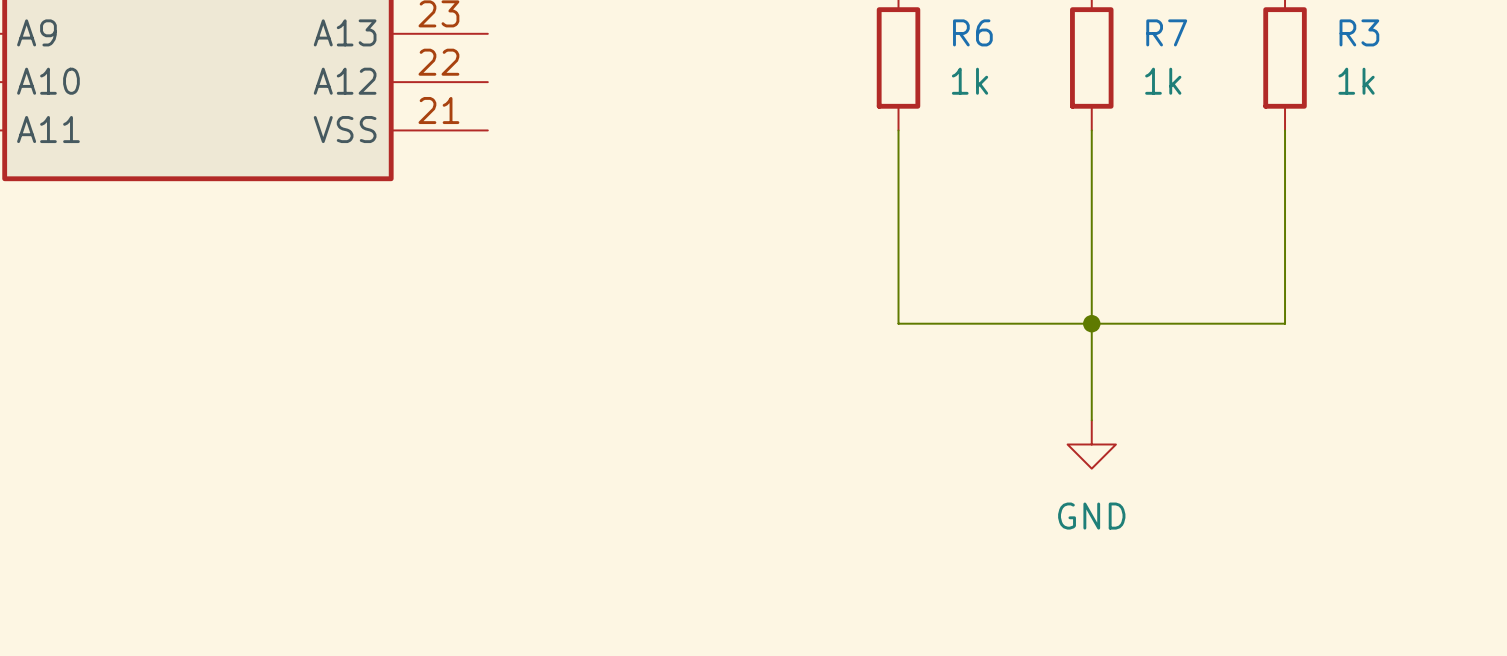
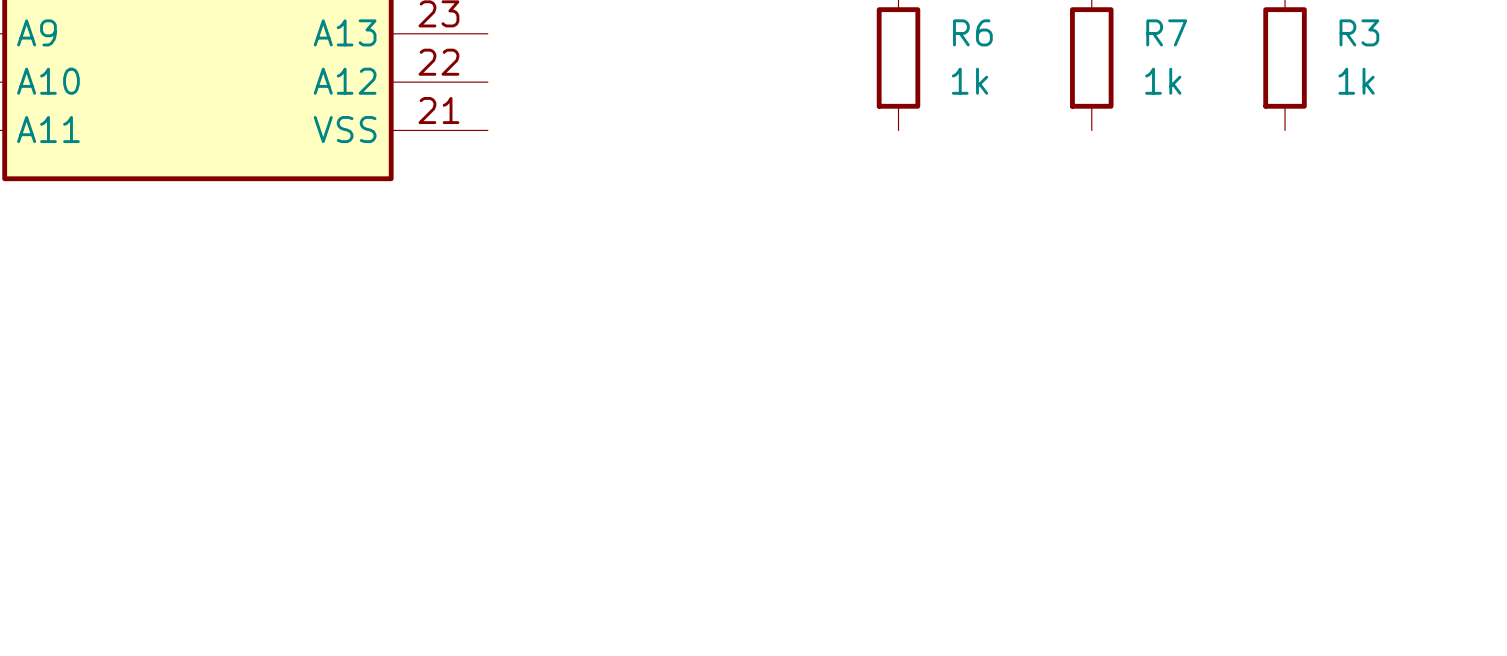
wire: (898, 130) (898, 323) (1285, 323) (1285, 130) -> none
wire: (1091, 130) (1091, 420) -> none
junction: (1091, 323) -> none
power symbol: GND (1091, 444) -> none

